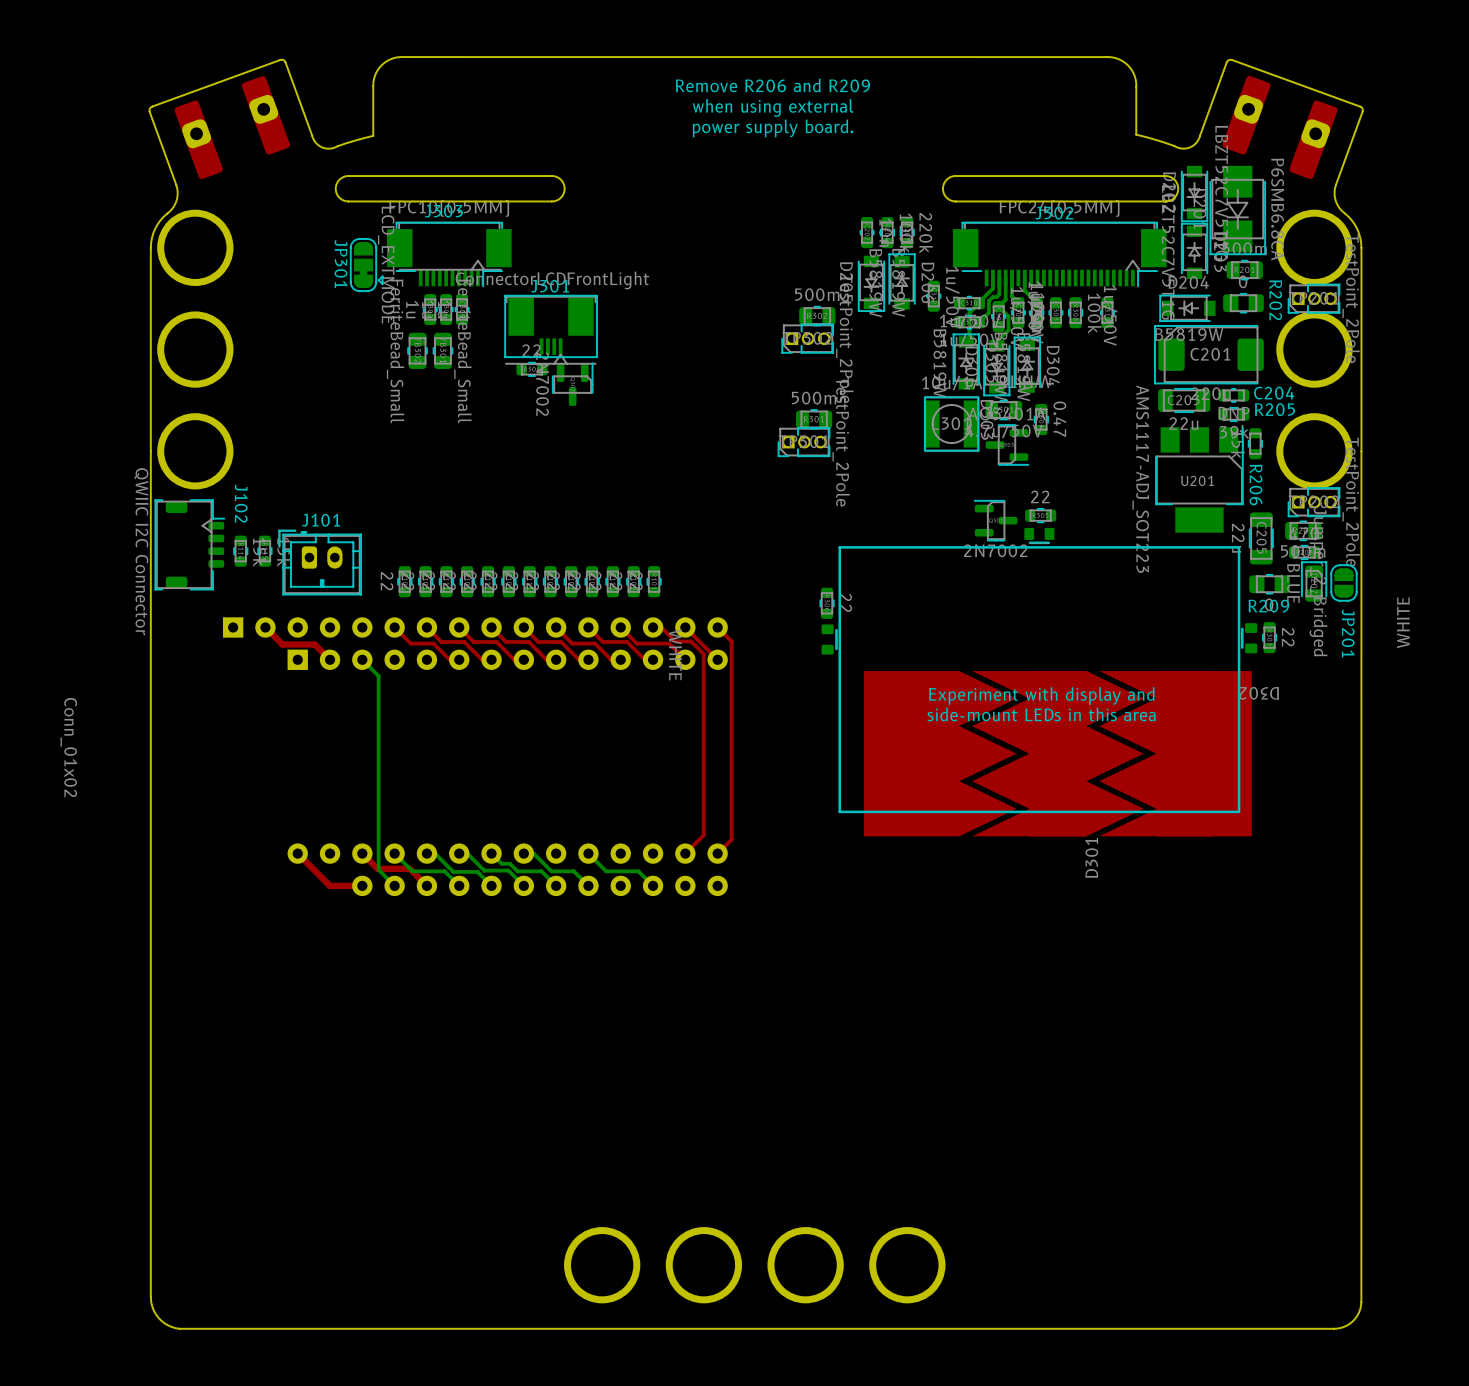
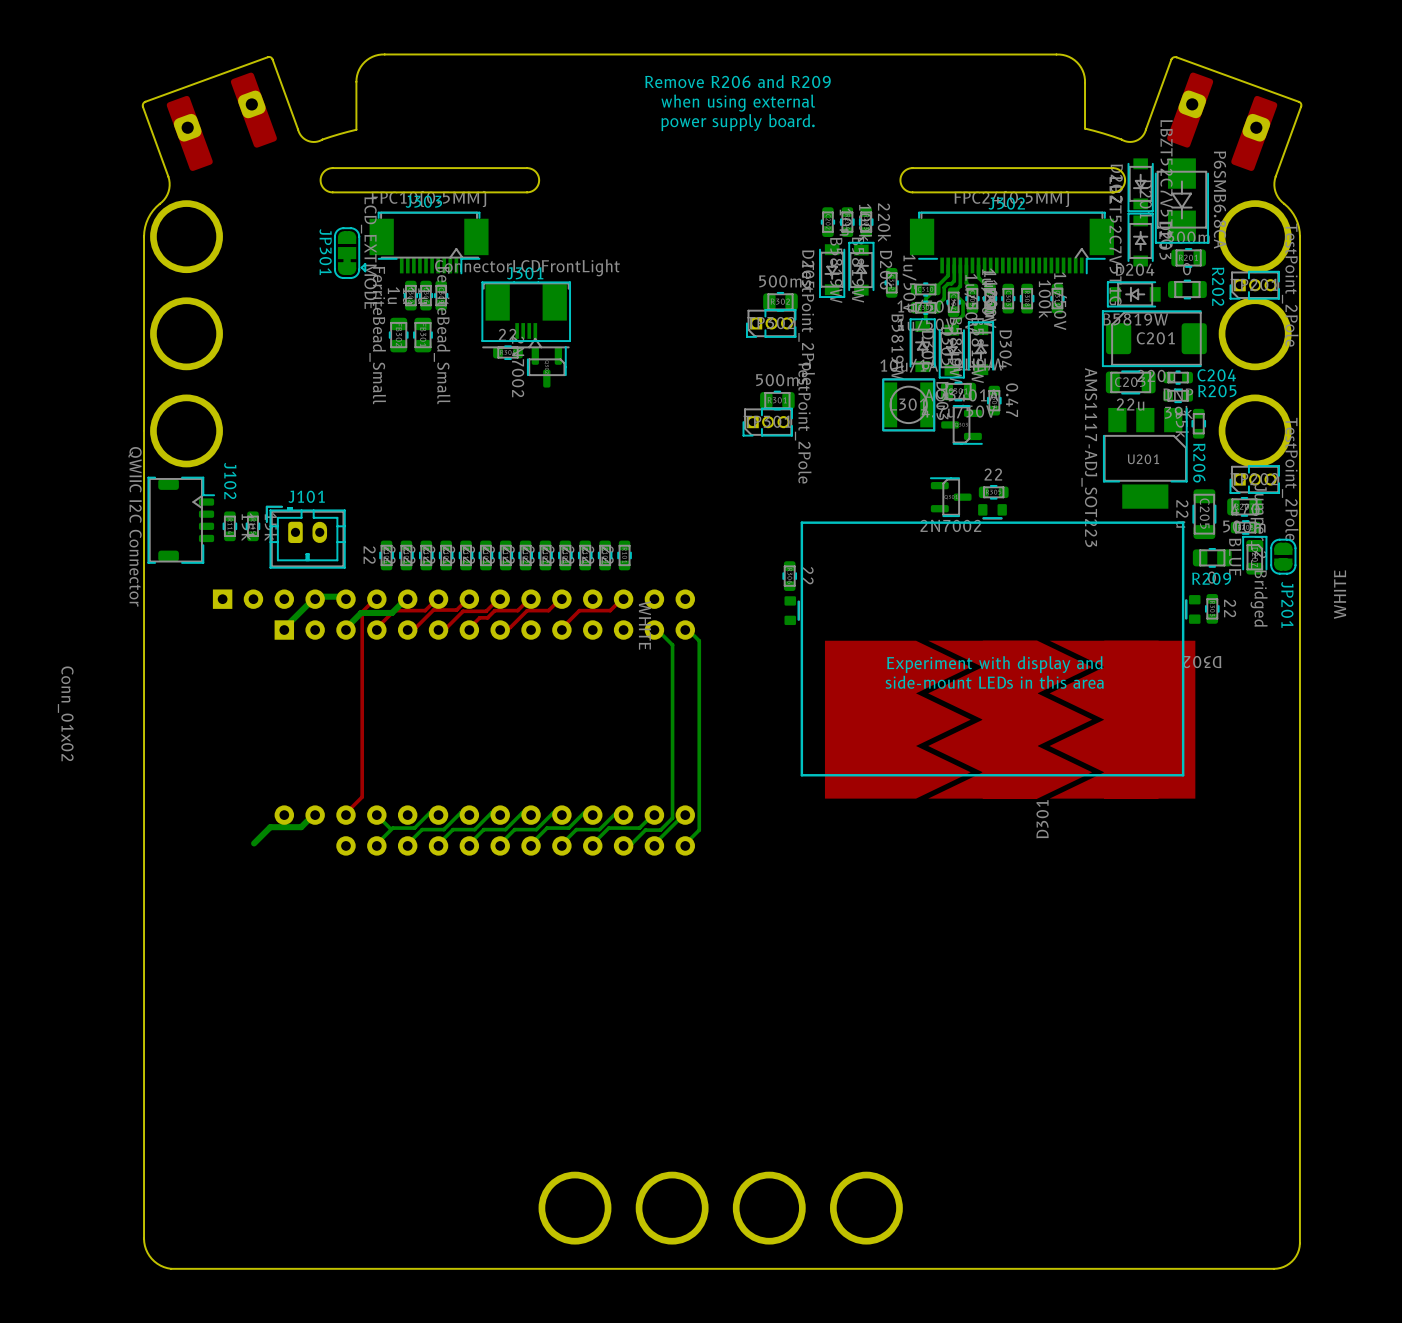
bottom track: none -> (346, 596) (315, 596) (284, 627)
top track: none -> (377, 596) (362, 611) (362, 797) (346, 812)
bottom track: none -> (408, 596) (392, 612) (361, 612) (346, 627)
top track: none -> (439, 596) (425, 610) (394, 610) (391, 614)
top track: none -> (469, 596) (456, 610) (433, 610) (416, 627) (408, 627)
top track: none -> (500, 596) (486, 611) (463, 611) (446, 627) (439, 627)
top track: none -> (531, 596) (517, 610) (494, 610) (487, 617) (479, 617) (469, 627)
top track: none -> (562, 596) (548, 610) (527, 610) (510, 627) (500, 627)
top track: none -> (624, 596) (610, 610) (579, 610) (562, 627)
top track: (265, 627) (282, 644) (314, 644) (330, 659) -> none
top track: (394, 627) (410, 643) (433, 643) (449, 659) (459, 659) -> none
top track: (426, 627) (441, 641) (464, 641) (482, 659) (491, 659) -> none
top track: (459, 627) (473, 641) (496, 641) (514, 659) (523, 659) -> none
top track: (491, 627) (506, 641) (528, 641) (546, 659) (556, 659) -> none
top track: (523, 627) (538, 641) (561, 641) (578, 659) (588, 659) -> none
top track: (556, 627) (572, 643) (595, 643) (611, 659) (620, 659) -> none
top track: (588, 627) (602, 641) (627, 641) (644, 659) (653, 659) -> none
top track: (620, 627) (636, 643) (669, 643) (685, 659) -> none
top track: (653, 627) (661, 627) (675, 641) (691, 641) (703, 653) (703, 835) (685, 853) -> none
top track: (685, 627) (717, 659) -> none
top track: (717, 627) (731, 641) (731, 839) (717, 853) -> none
top track: none -> (390, 614) (377, 627)
bottom track: none -> (655, 627) (672, 645) (672, 818) (660, 830) (645, 830) (632, 843) (624, 843)
bottom track: none -> (685, 627) (699, 640) (699, 830) (685, 843)
bottom track: (362, 659) (378, 676) (378, 869) (394, 885) -> none
bottom track: none -> (315, 812) (301, 827) (270, 827) (254, 843)
bottom track: none -> (439, 812) (430, 812) (414, 828) (392, 828) (377, 843)
bottom track: none -> (469, 812) (460, 812) (443, 829) (422, 829) (408, 843)
bottom track: none -> (500, 812) (491, 812) (474, 829) (452, 829) (439, 843)
bottom track: none -> (531, 812) (522, 812) (505, 829) (483, 829) (469, 843)
bottom track: none -> (562, 812) (553, 812) (536, 829) (514, 829) (500, 843)
bottom track: none -> (593, 812) (584, 812) (568, 828) (547, 828) (531, 843)
bottom track: none -> (624, 812) (616, 812) (599, 829) (576, 829) (562, 843)
bottom track: none -> (655, 812) (639, 828) (608, 828) (593, 843)
bottom track: none -> (685, 812) (655, 843)
top track: (297, 853) (330, 885) (362, 885) -> none
top track: (362, 853) (377, 868) (409, 868) (426, 885) -> none
bottom track: (426, 853) (435, 853) (453, 871) (477, 871) (491, 885) -> none
bottom track: (459, 853) (467, 853) (484, 870) (508, 870) (523, 885) -> none
bottom track: (491, 853) (501, 863) (510, 863) (517, 871) (541, 871) (556, 885) -> none
bottom track: (523, 853) (533, 853) (551, 871) (573, 871) (588, 885) -> none
bottom track: (588, 853) (606, 871) (638, 871) (653, 885) -> none
bottom track: (408, 867) (412, 871) (444, 871) (459, 885) -> none

